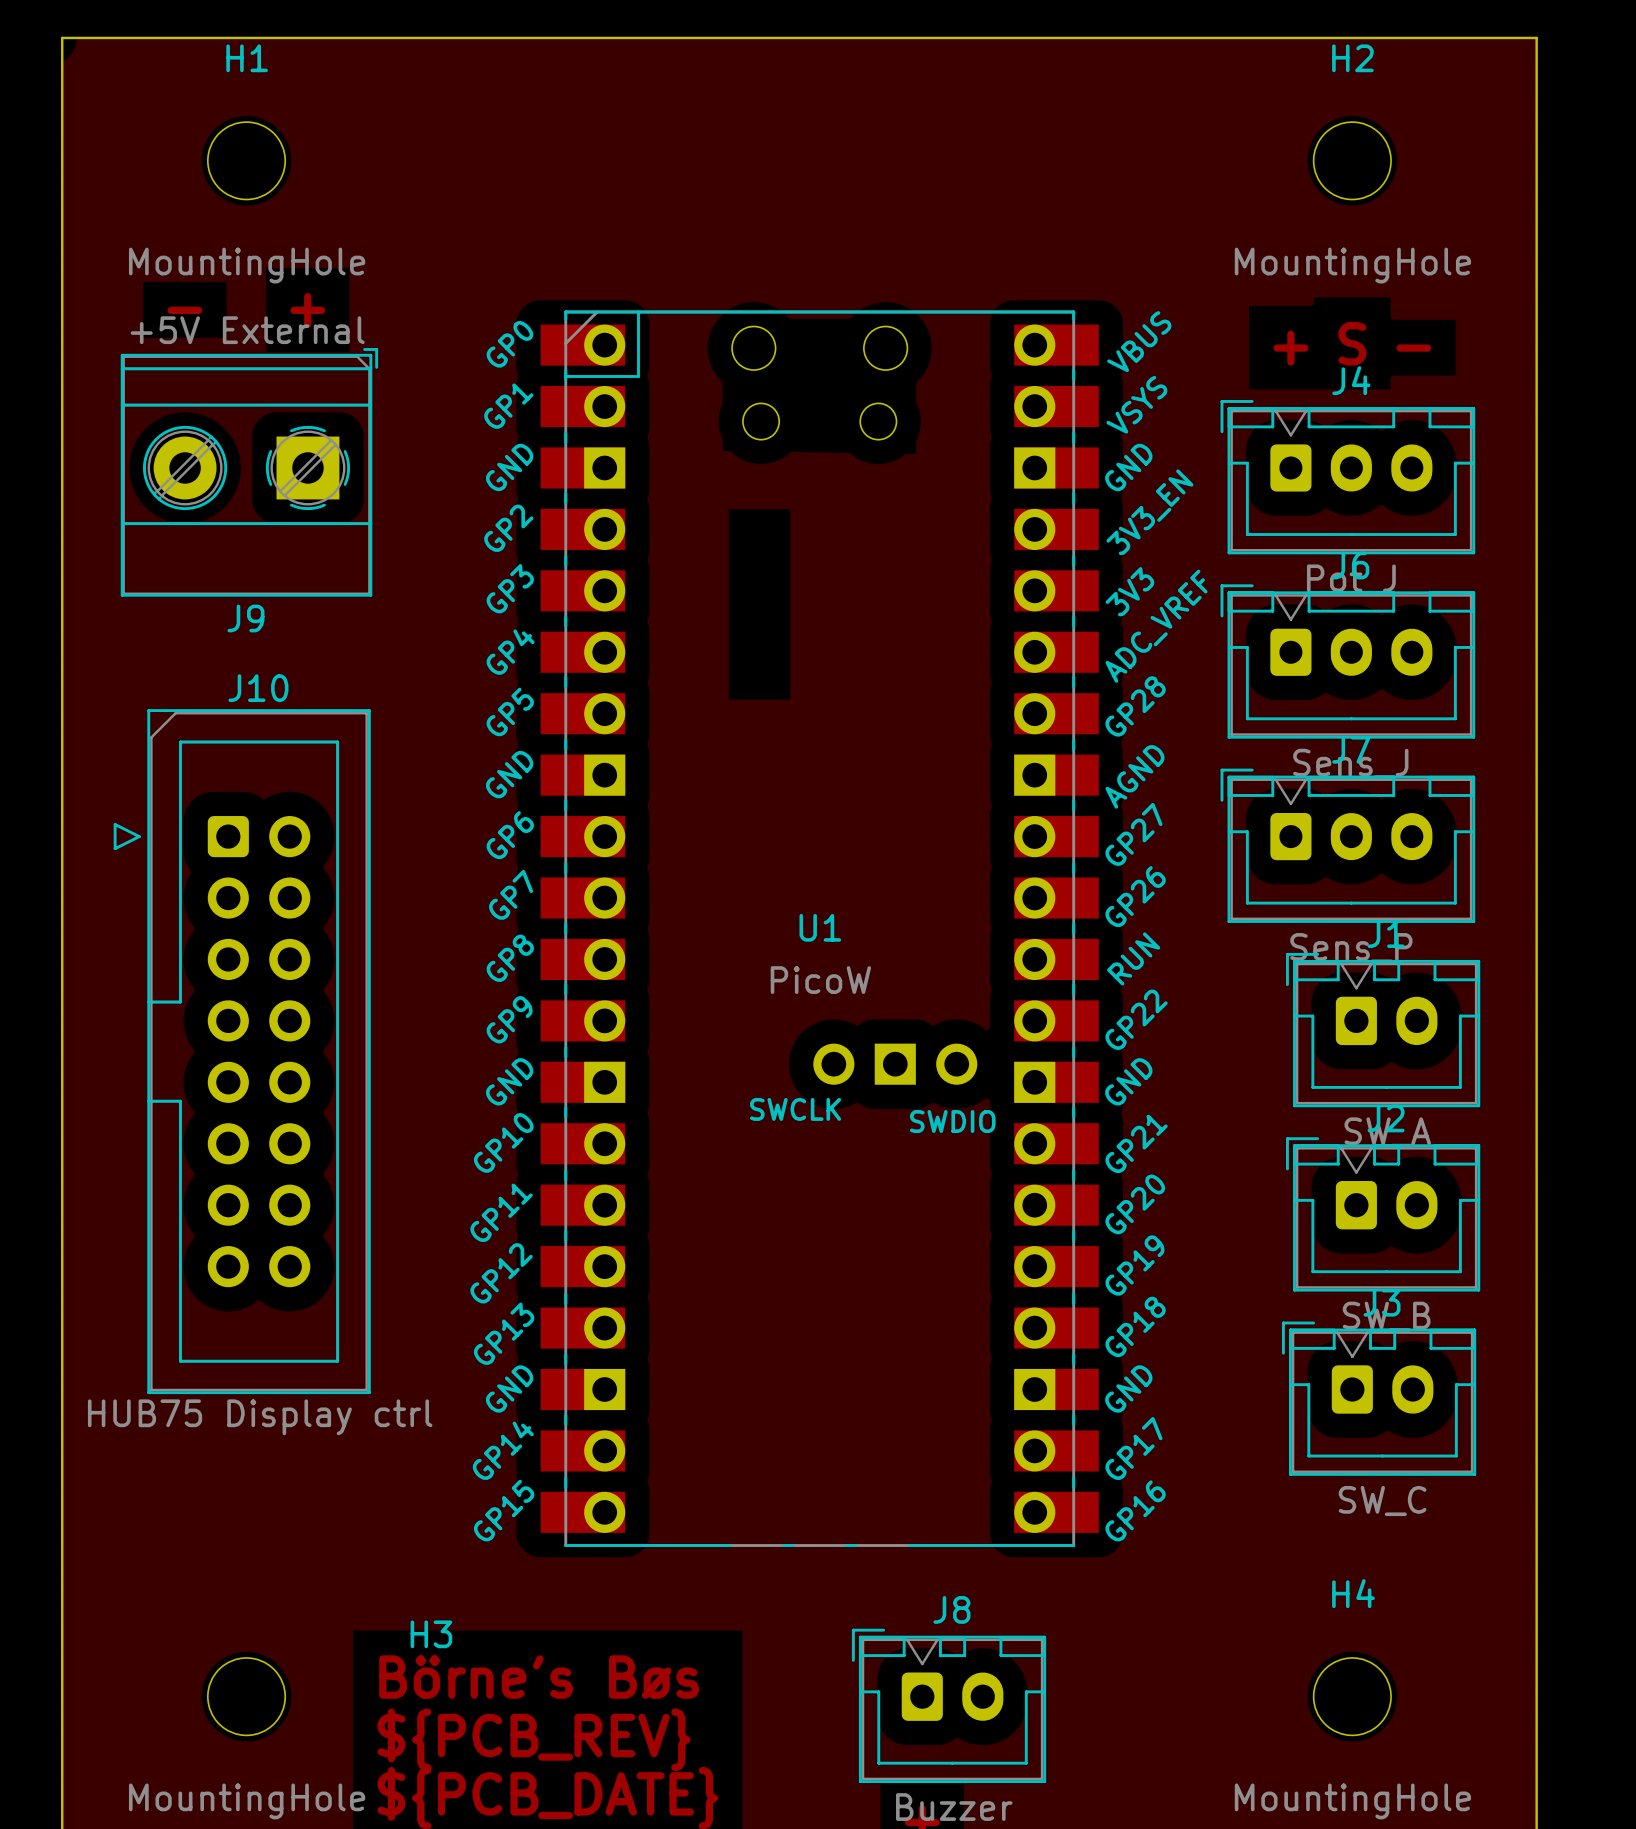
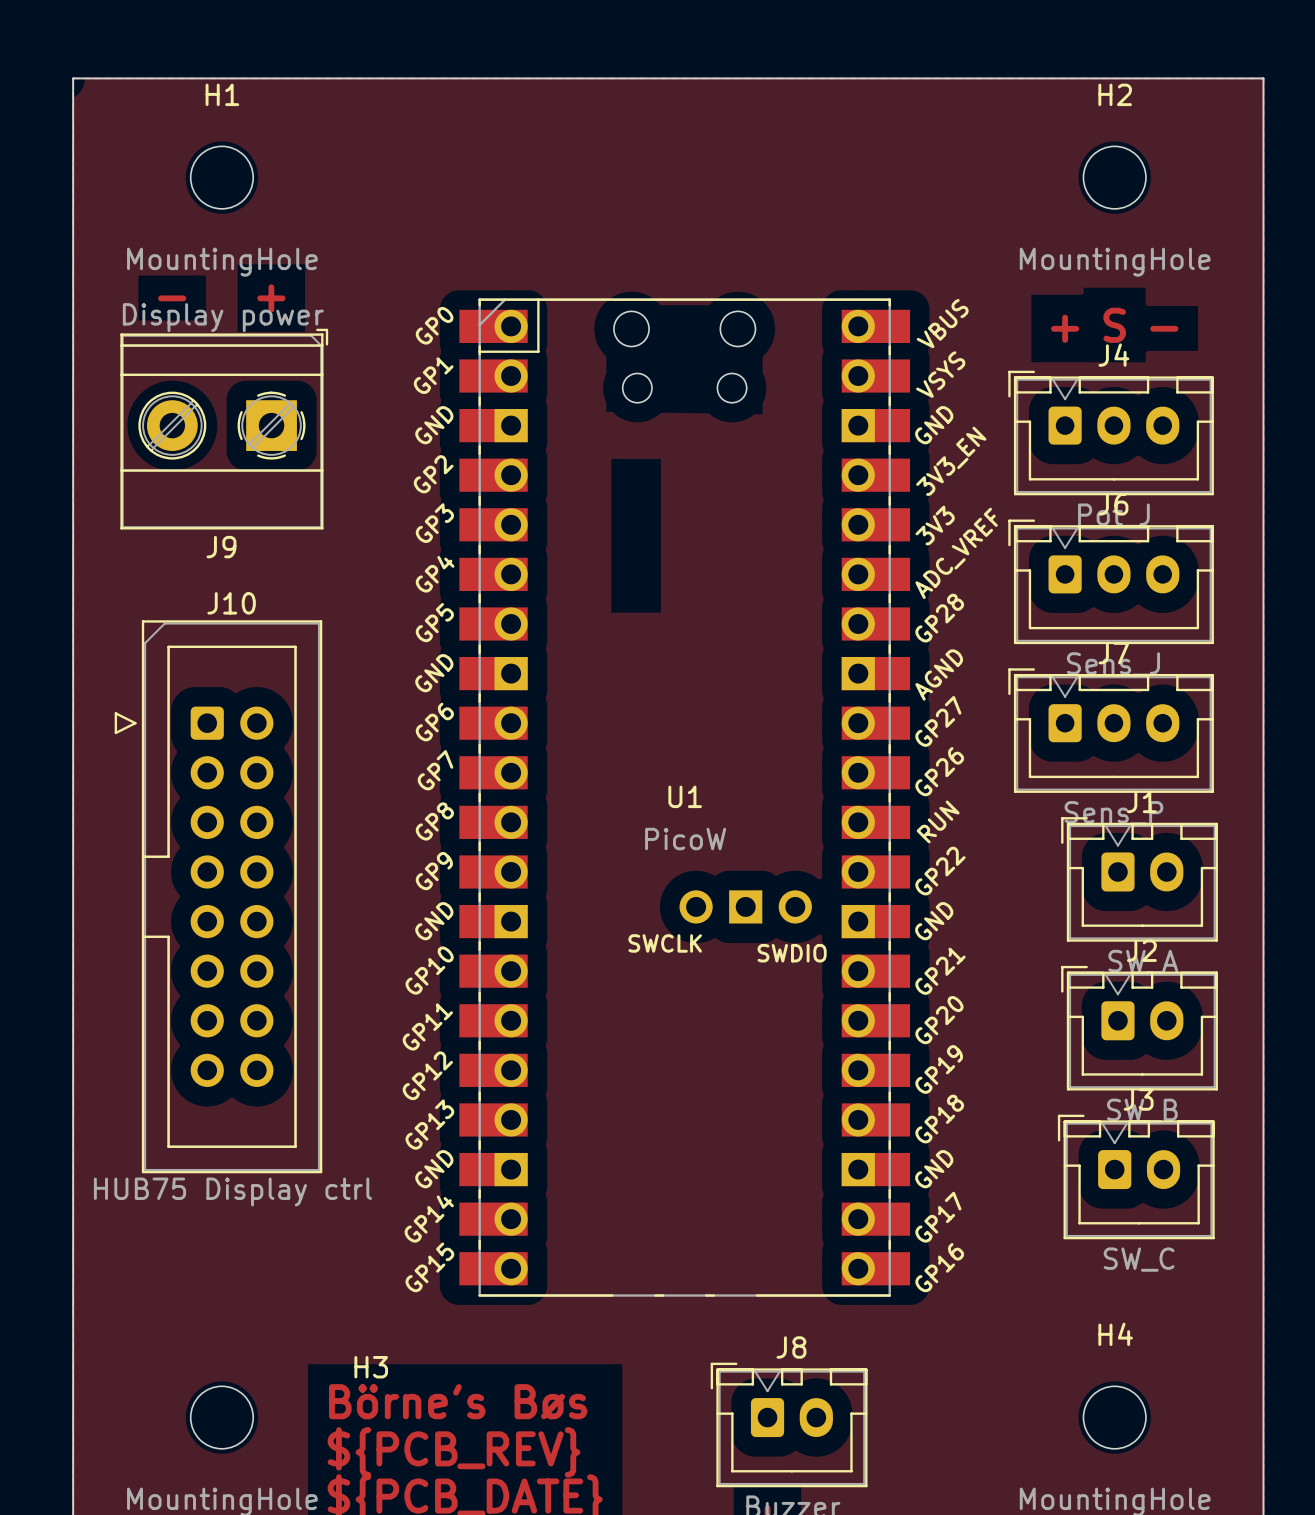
J9 value: +5V External (247, 330) -> Display power (223, 317)

